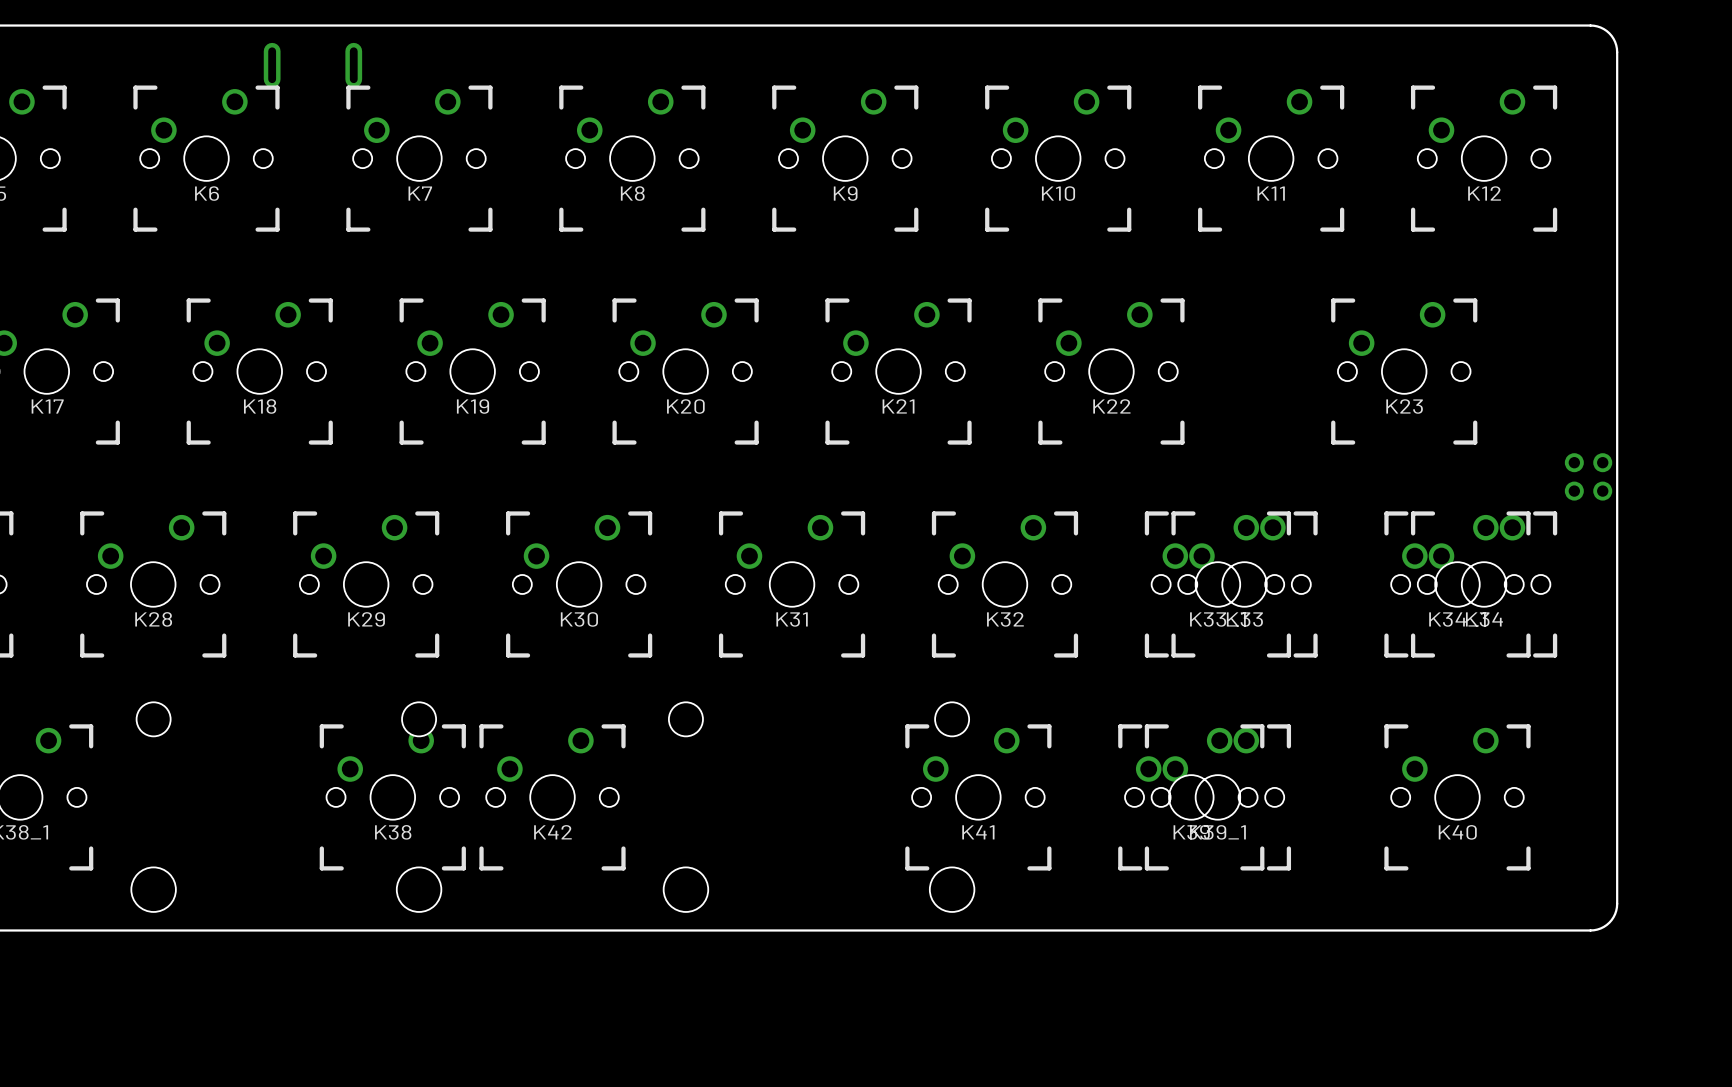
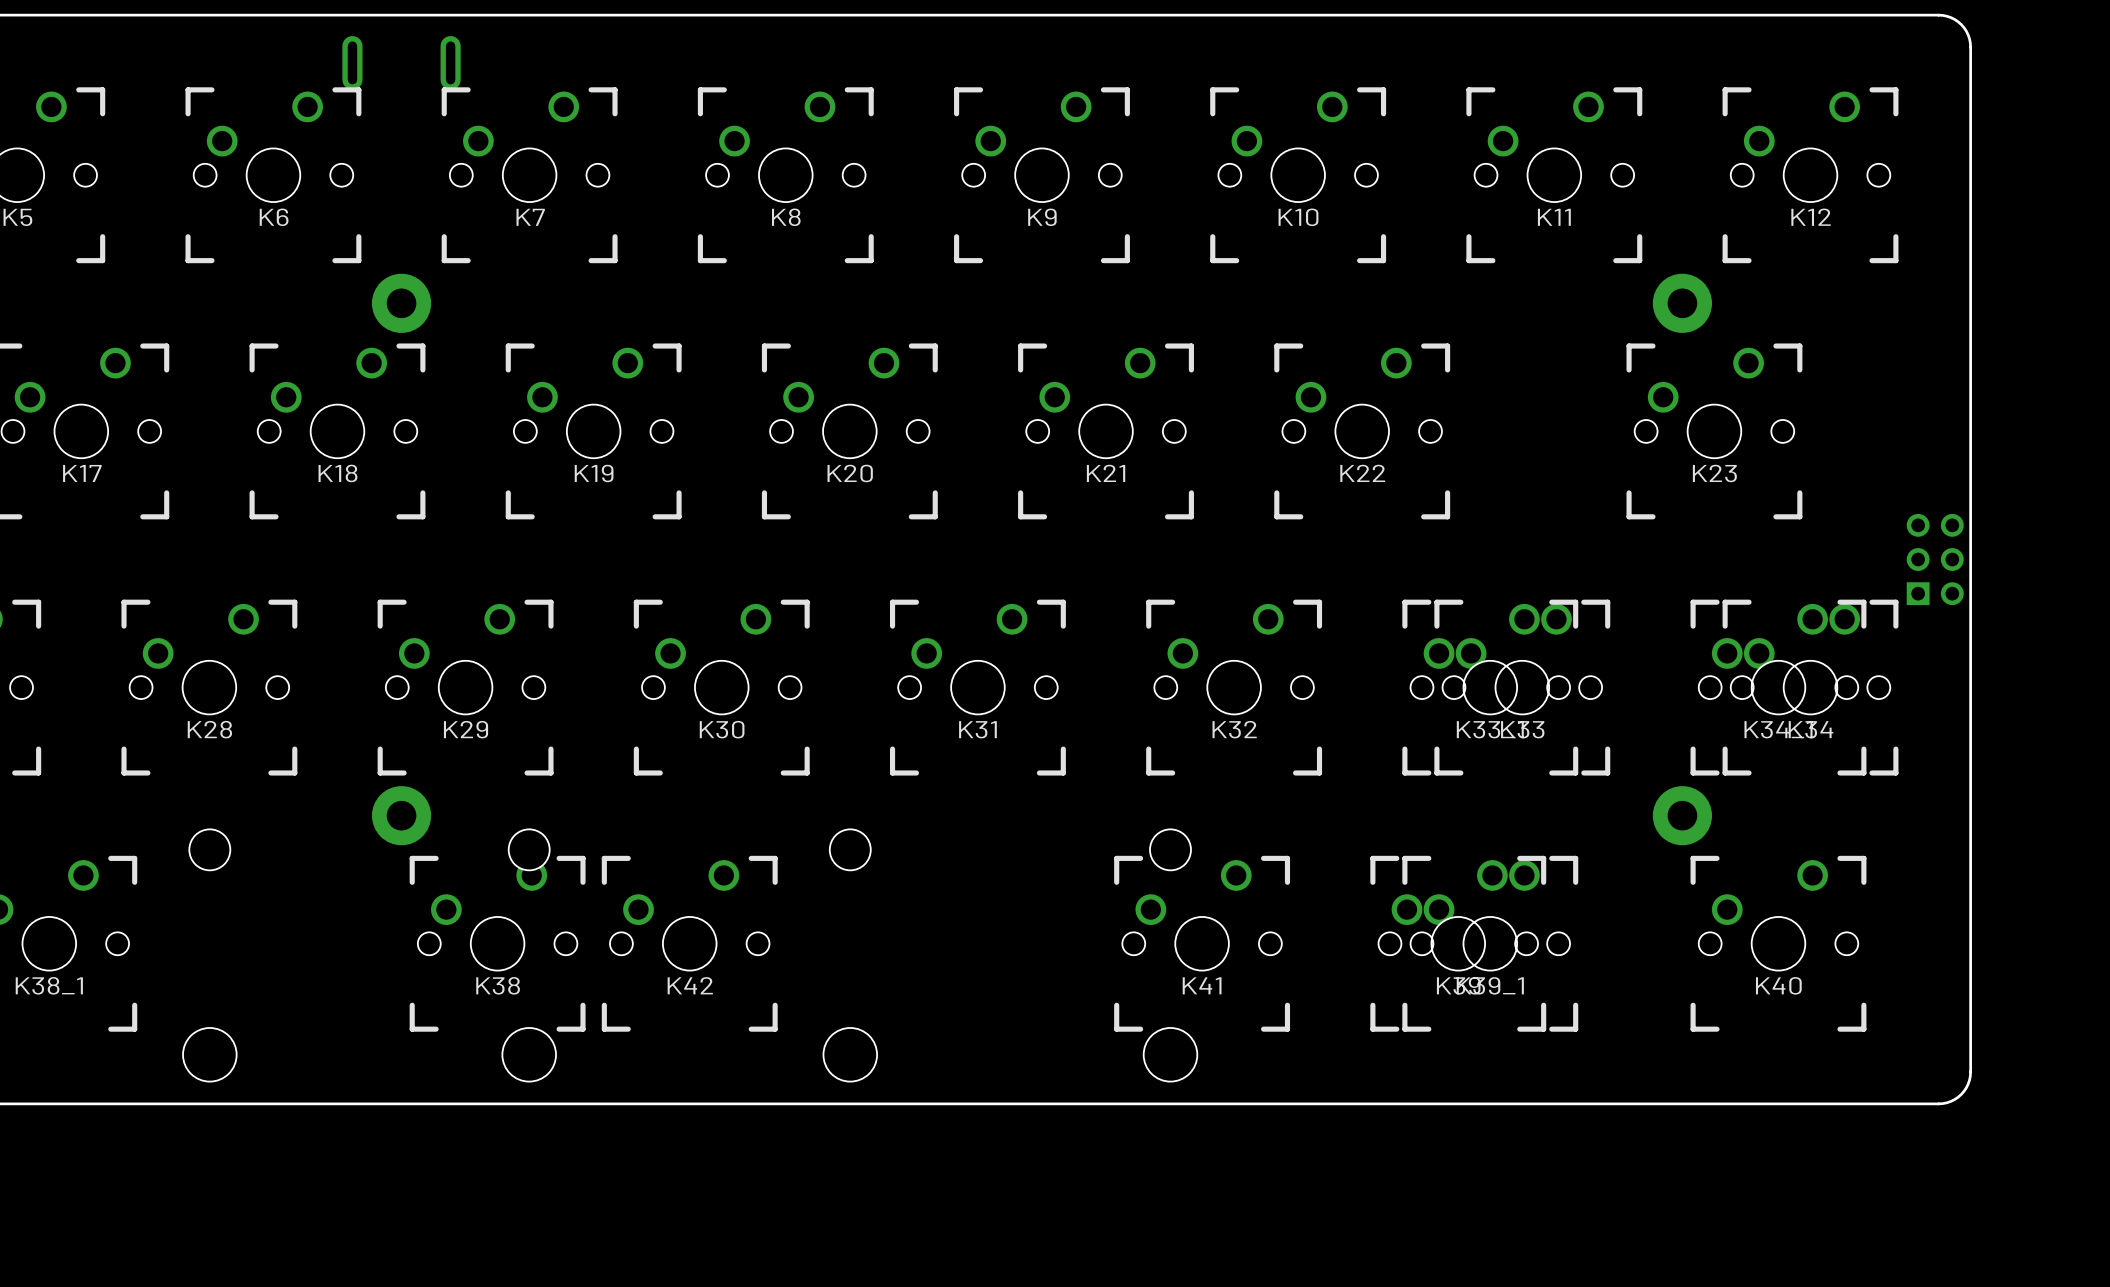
part: none -> (401, 303)
part: none -> (1682, 303)
part footprint: [1564, 453, 1613, 501] -> [1906, 513, 1964, 606]
part: none -> (401, 815)
part: none -> (1682, 815)

